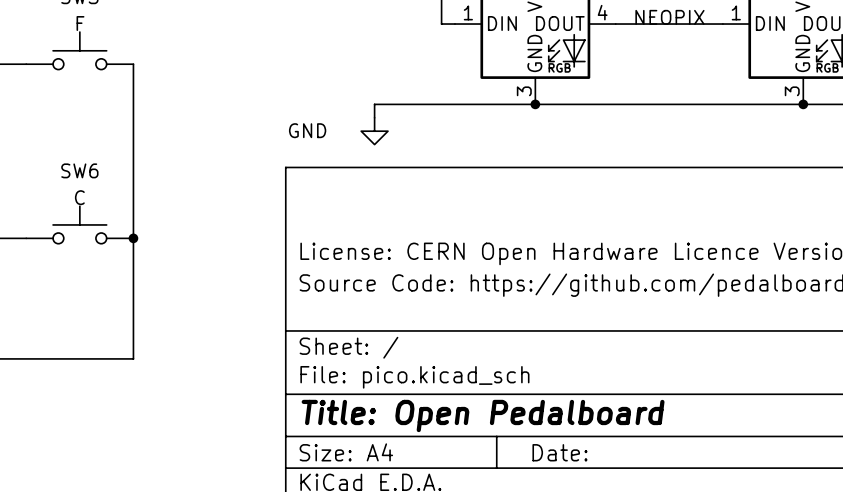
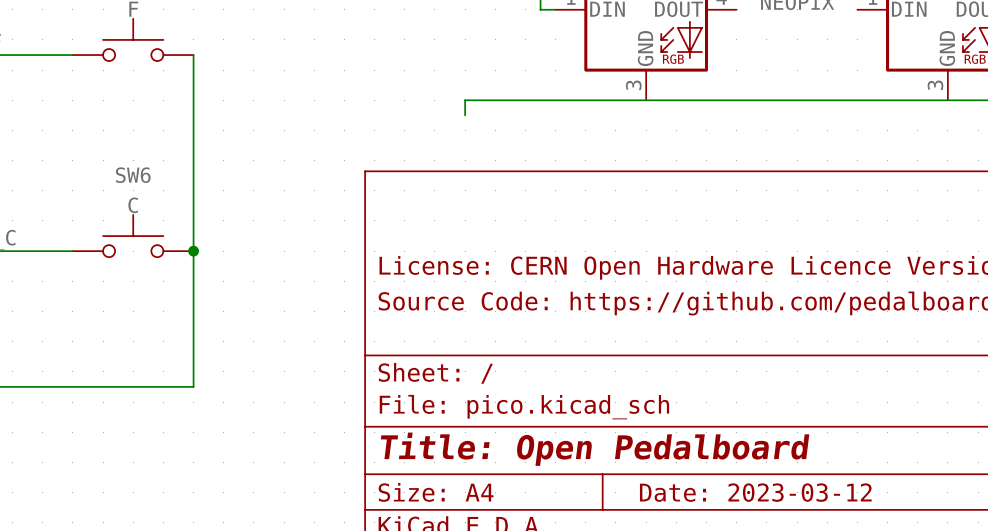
wire: (615, 24) (722, 24) -> none
junction: (535, 104) -> none
junction: (803, 104) -> none
power symbol: GND (374, 131) -> none
title block: Date: (559, 452) -> Date: 2023-03-12 (755, 492)

